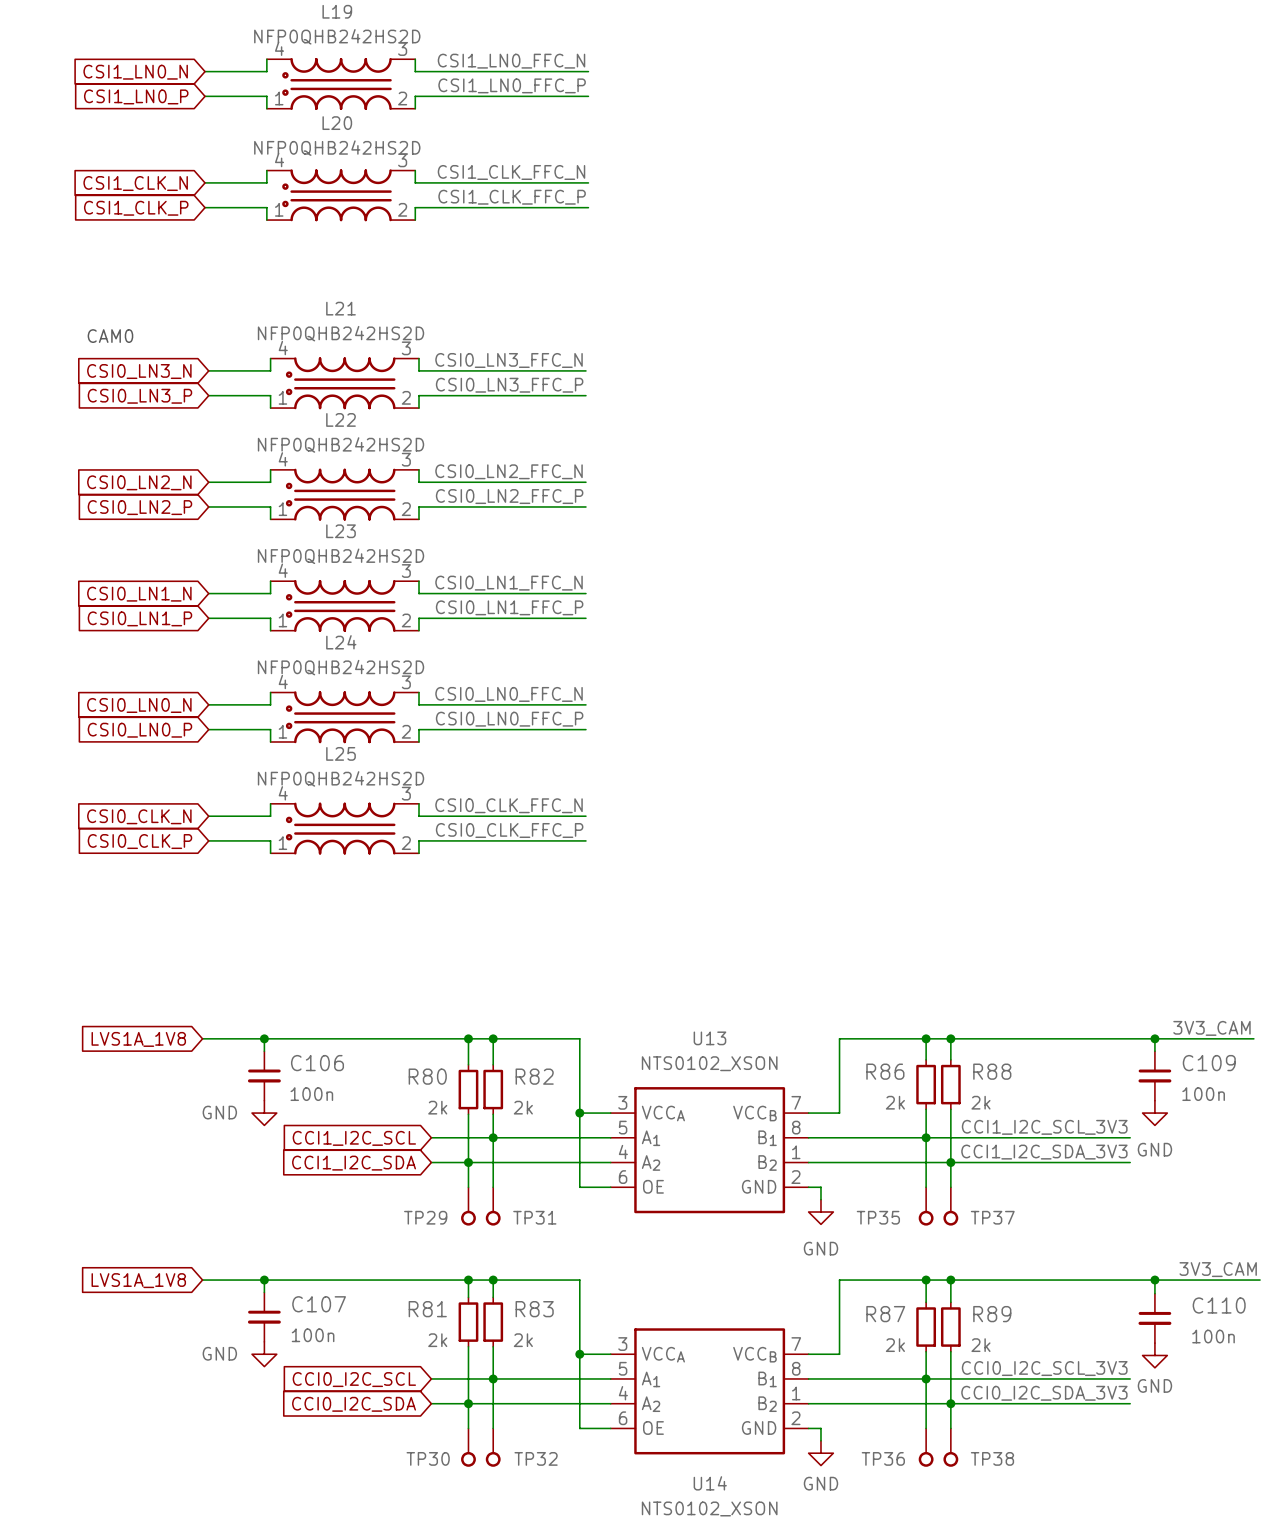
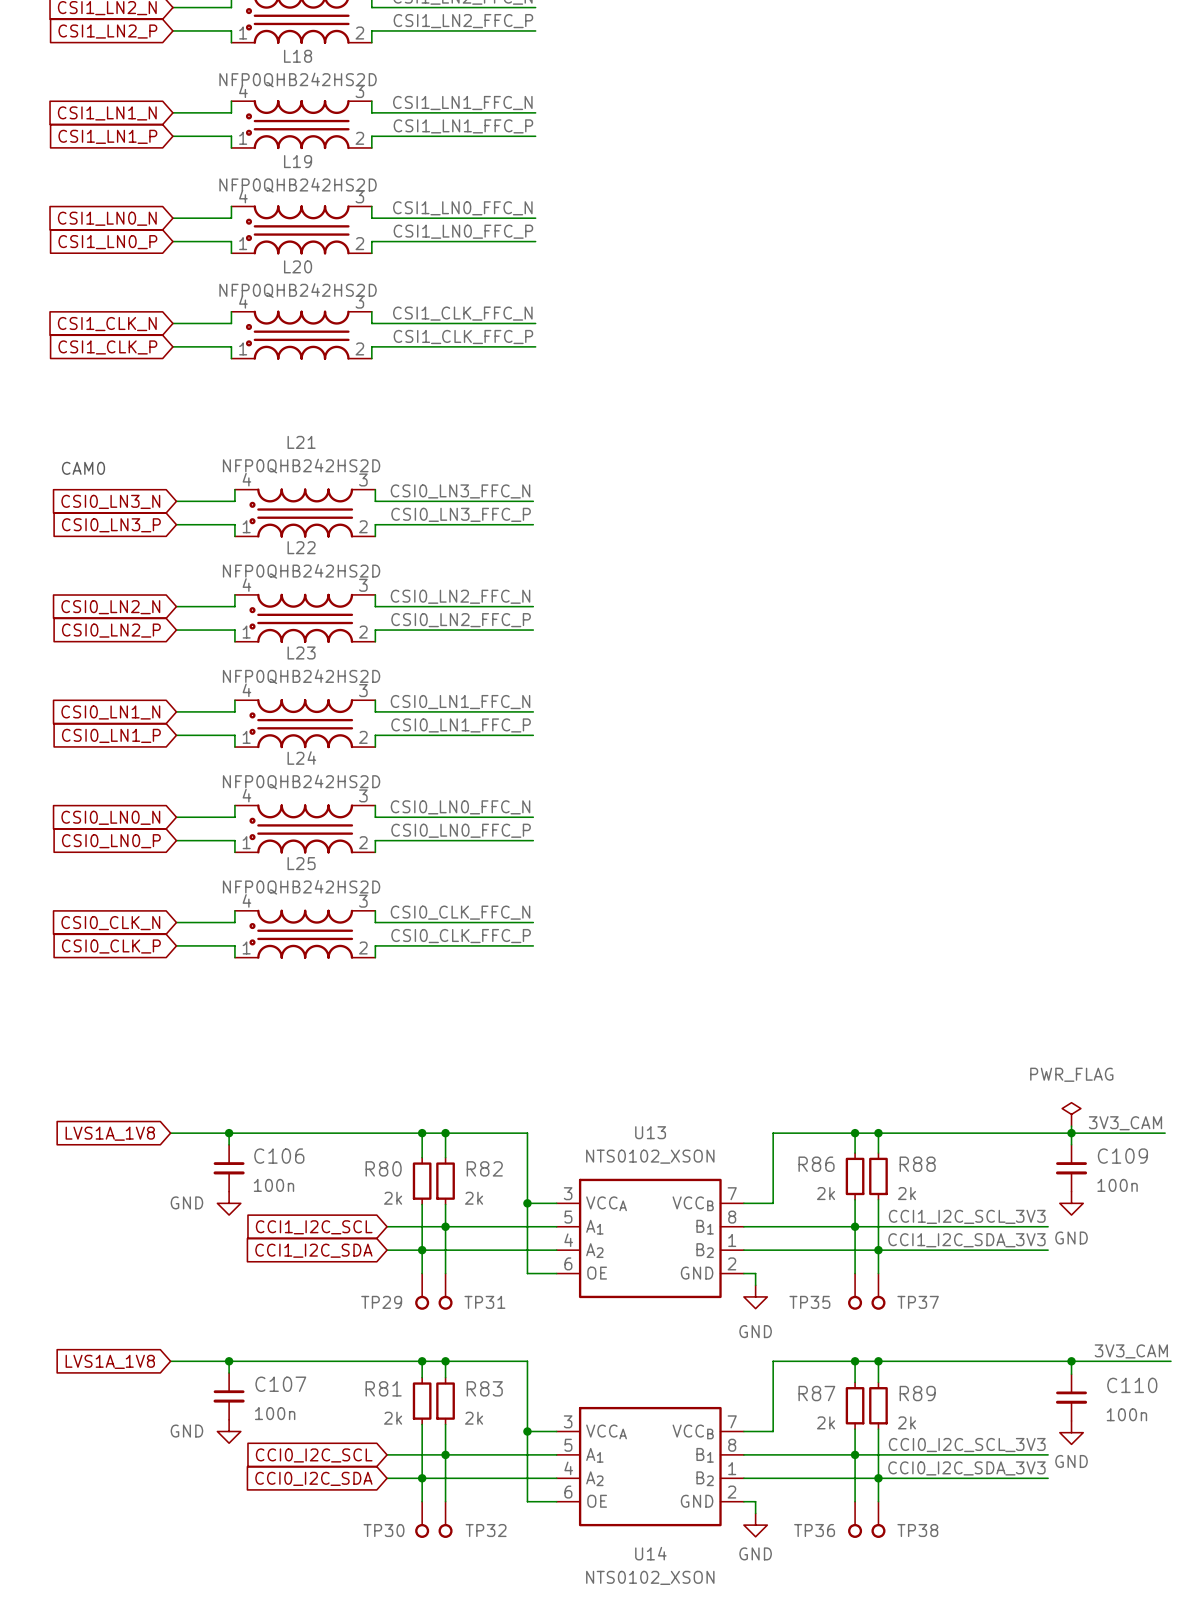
power symbol: none -> PWR_FLAG (1071, 1114)

